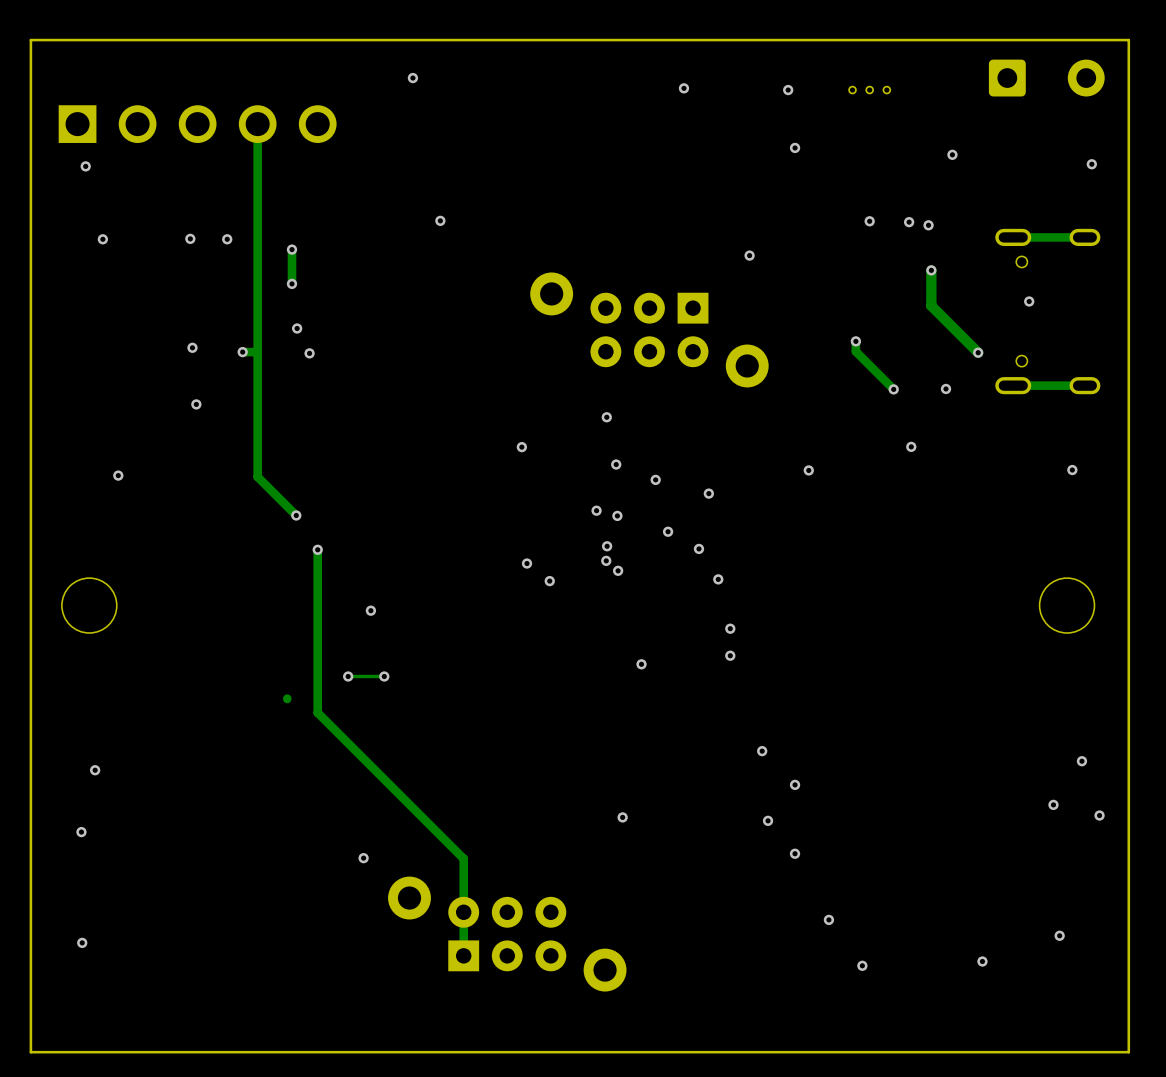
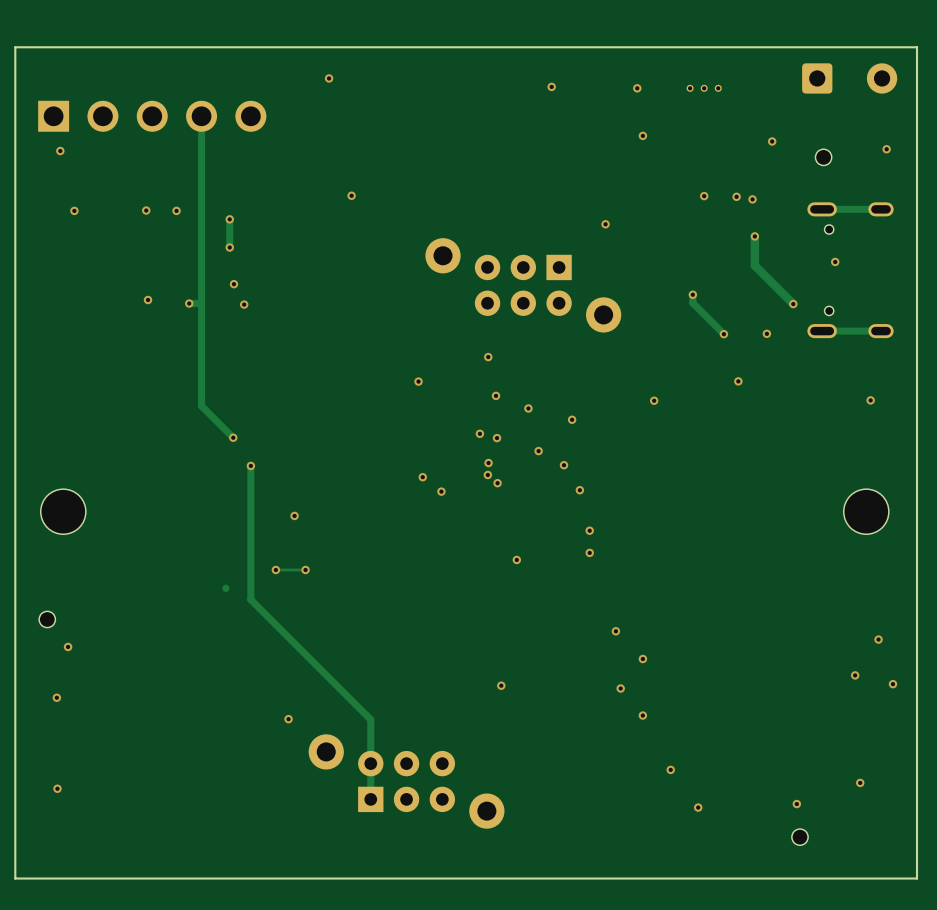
part: none -> (823, 157)
via: (196, 404) -> none
via: (118, 475) -> none
part: none -> (47, 619)
part: none -> (800, 837)

